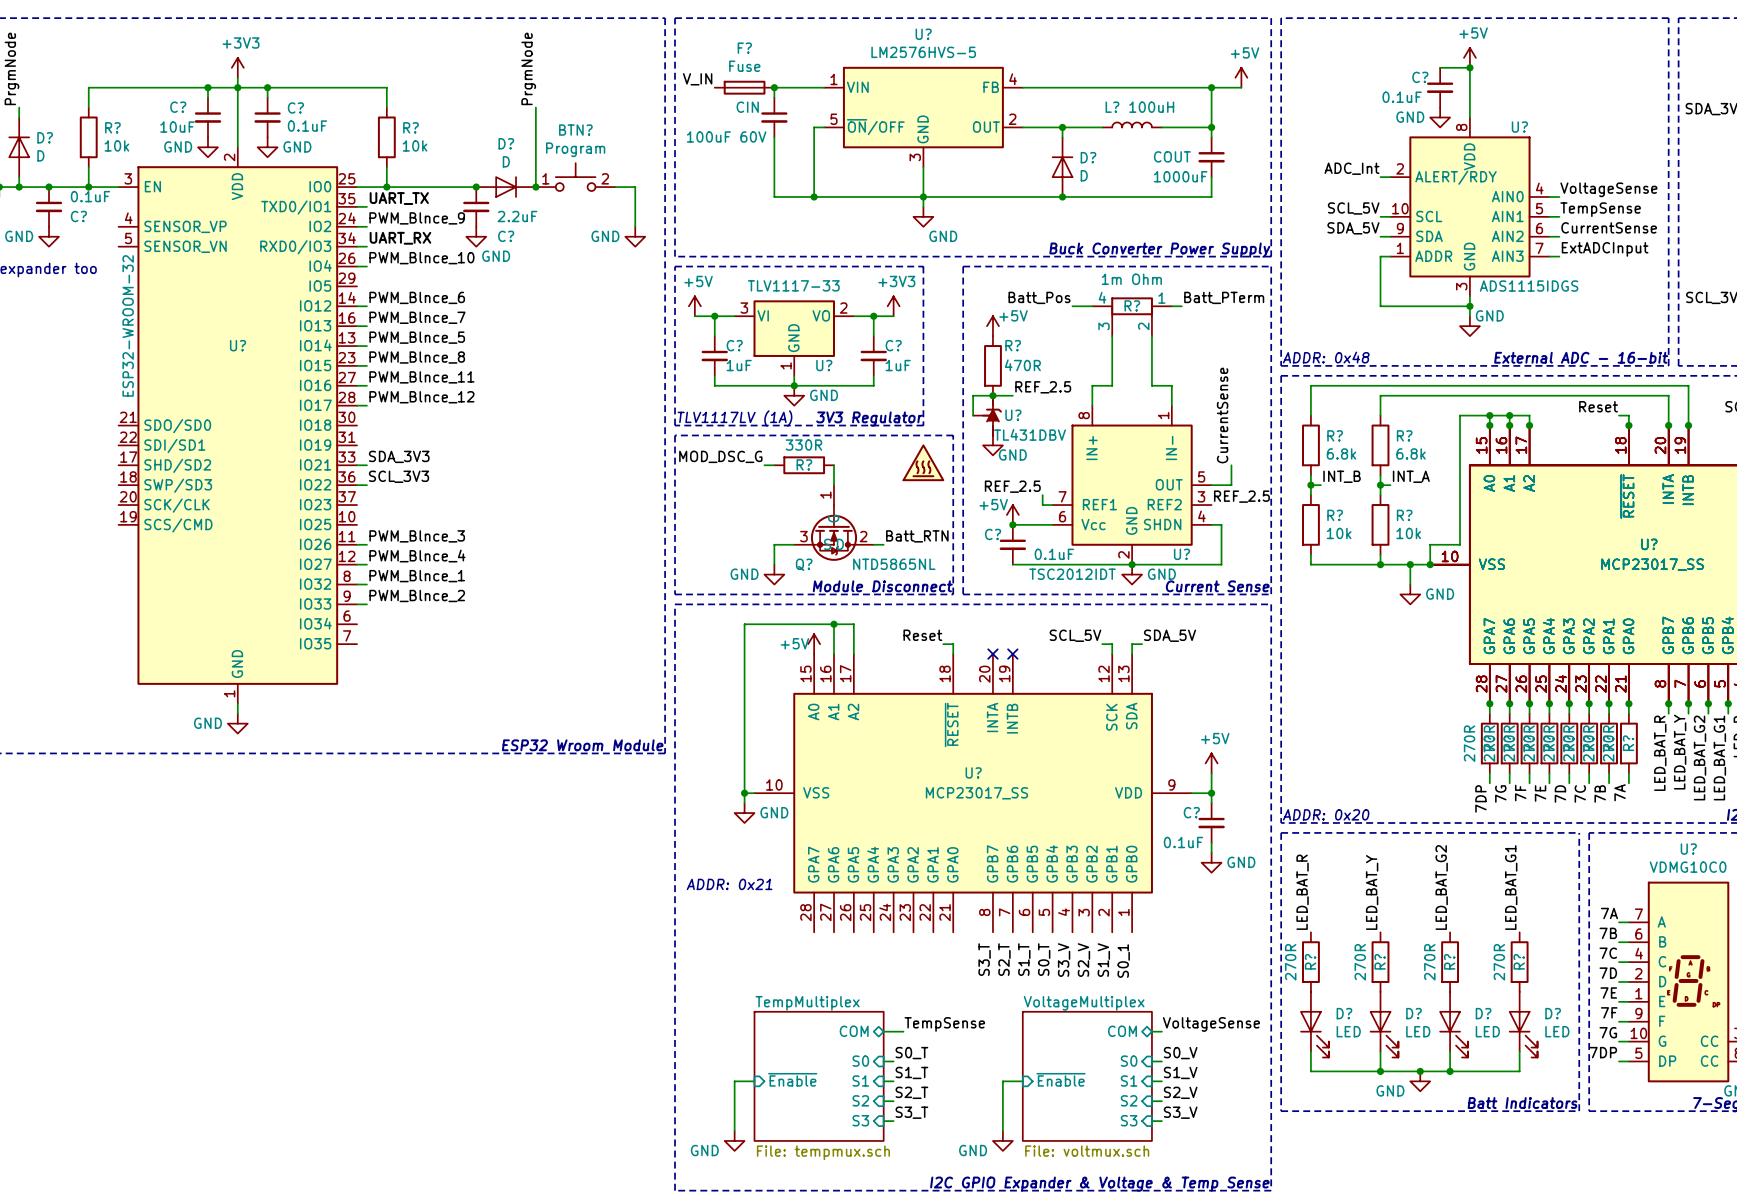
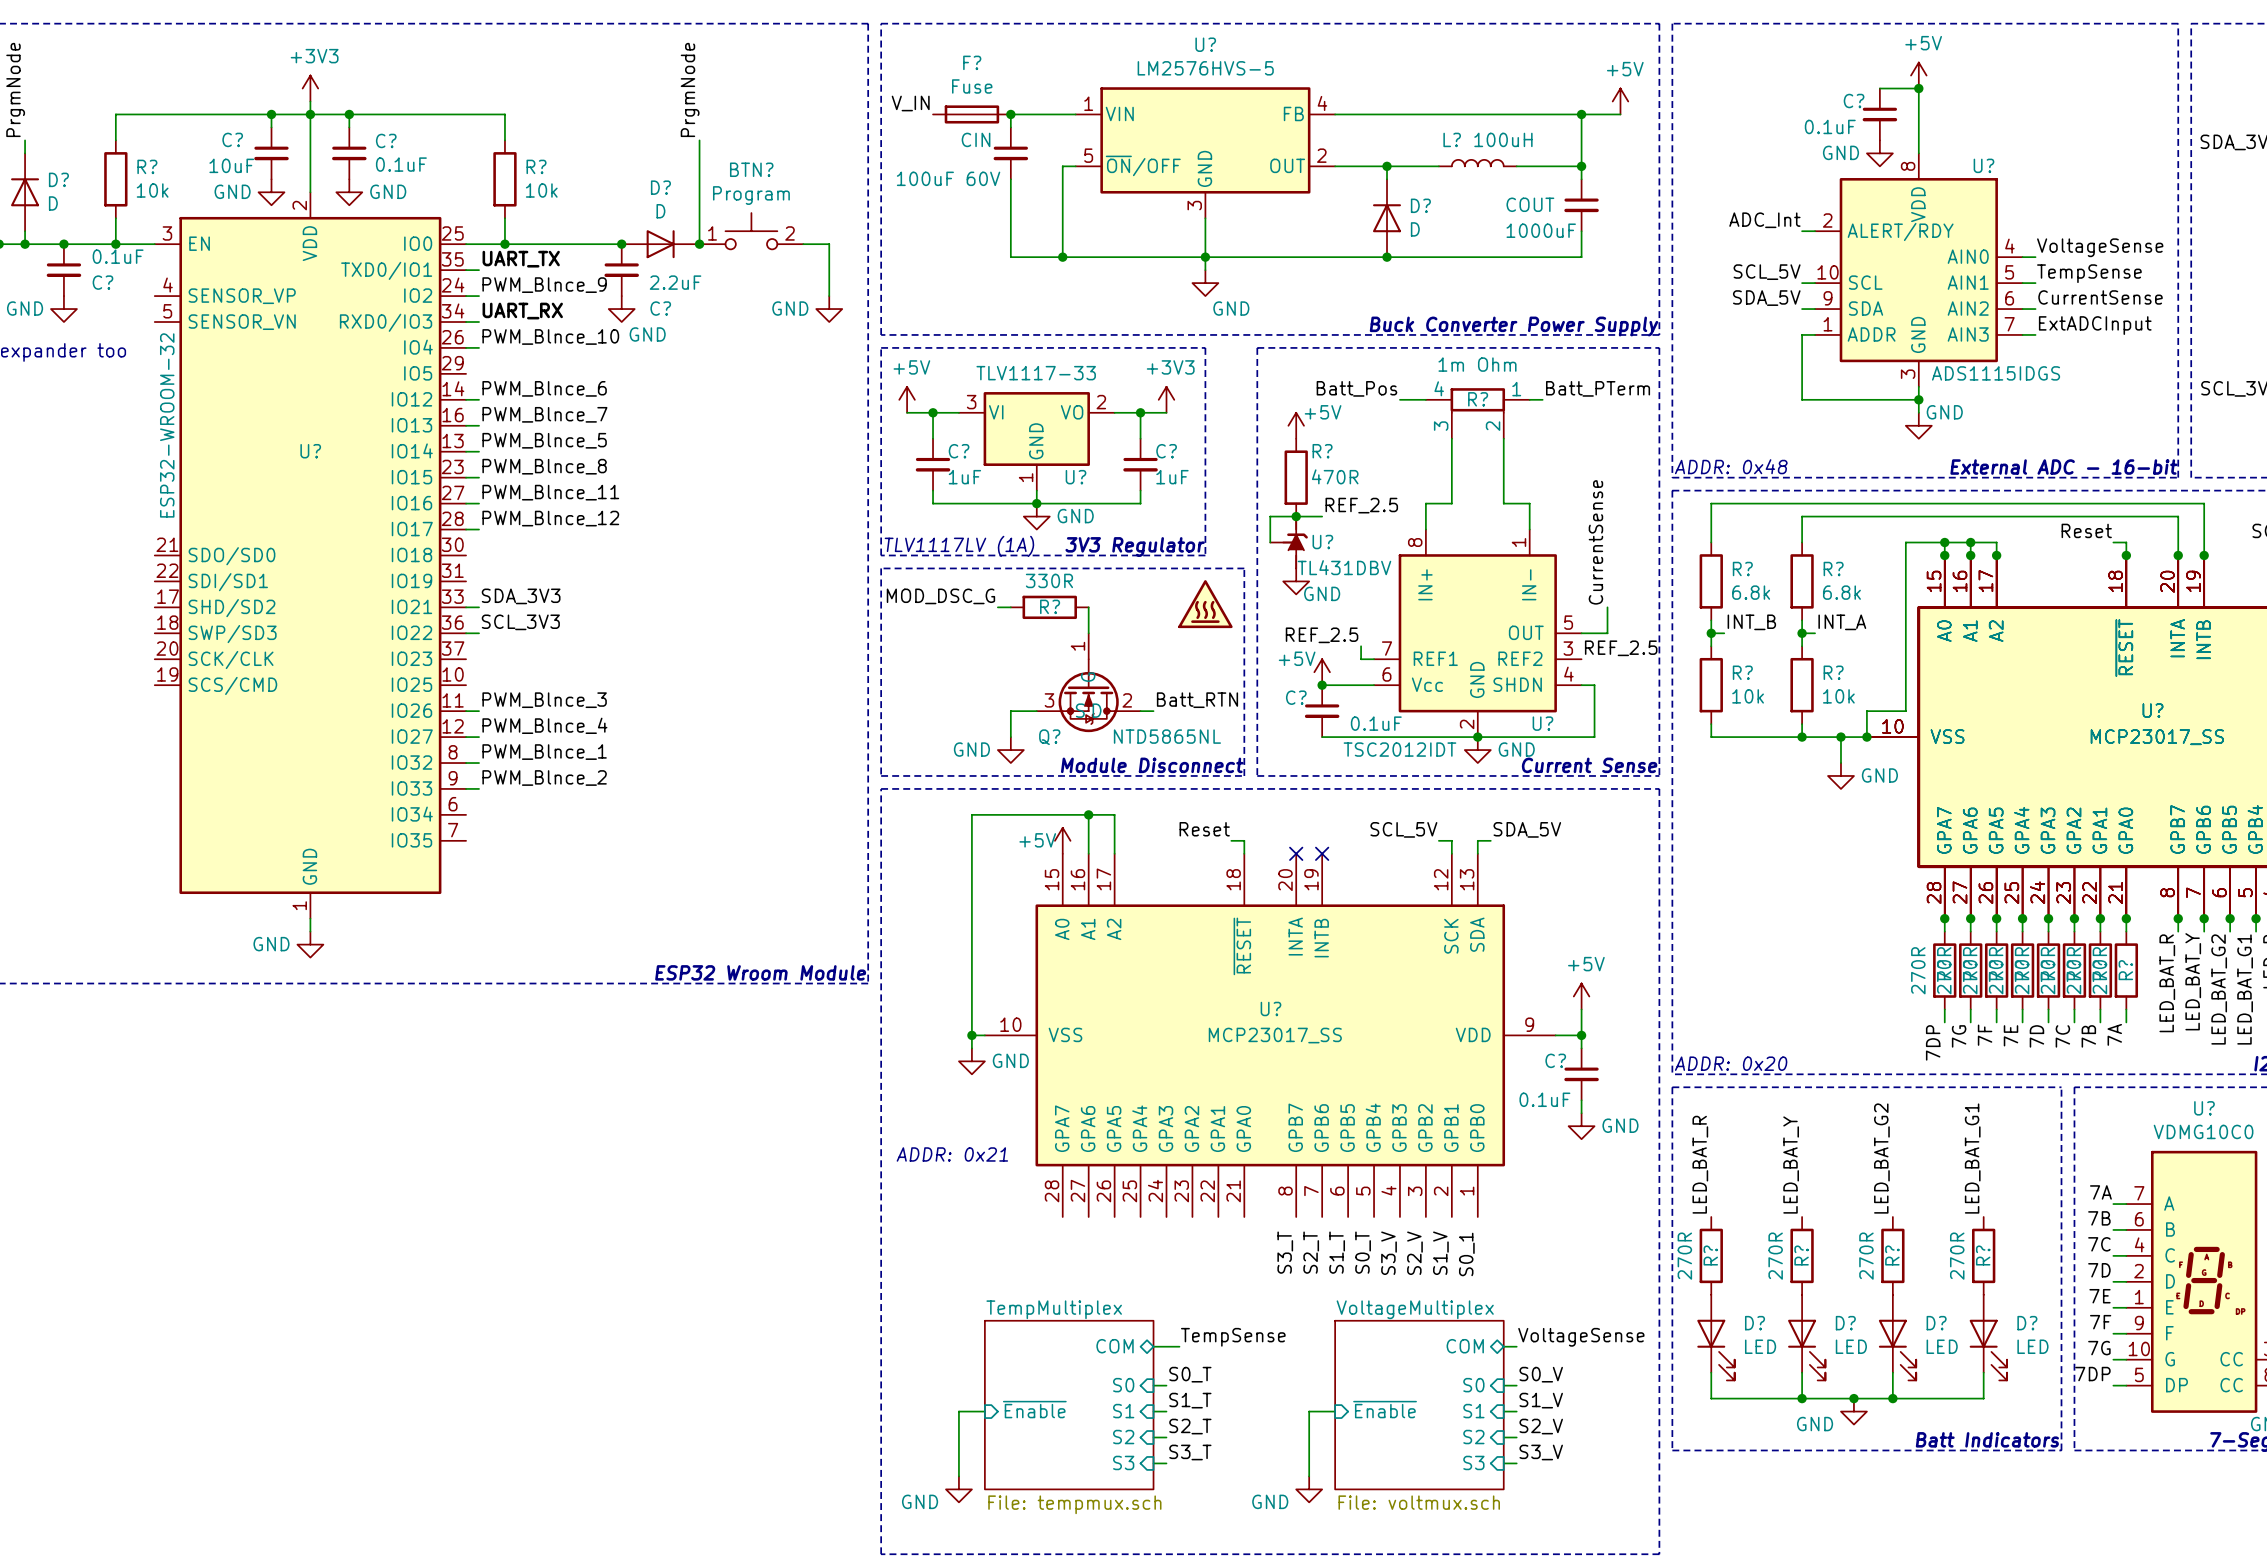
text: I2C GPIO Expander & Voltage & Temp Sense (1099, 1184) -> none

